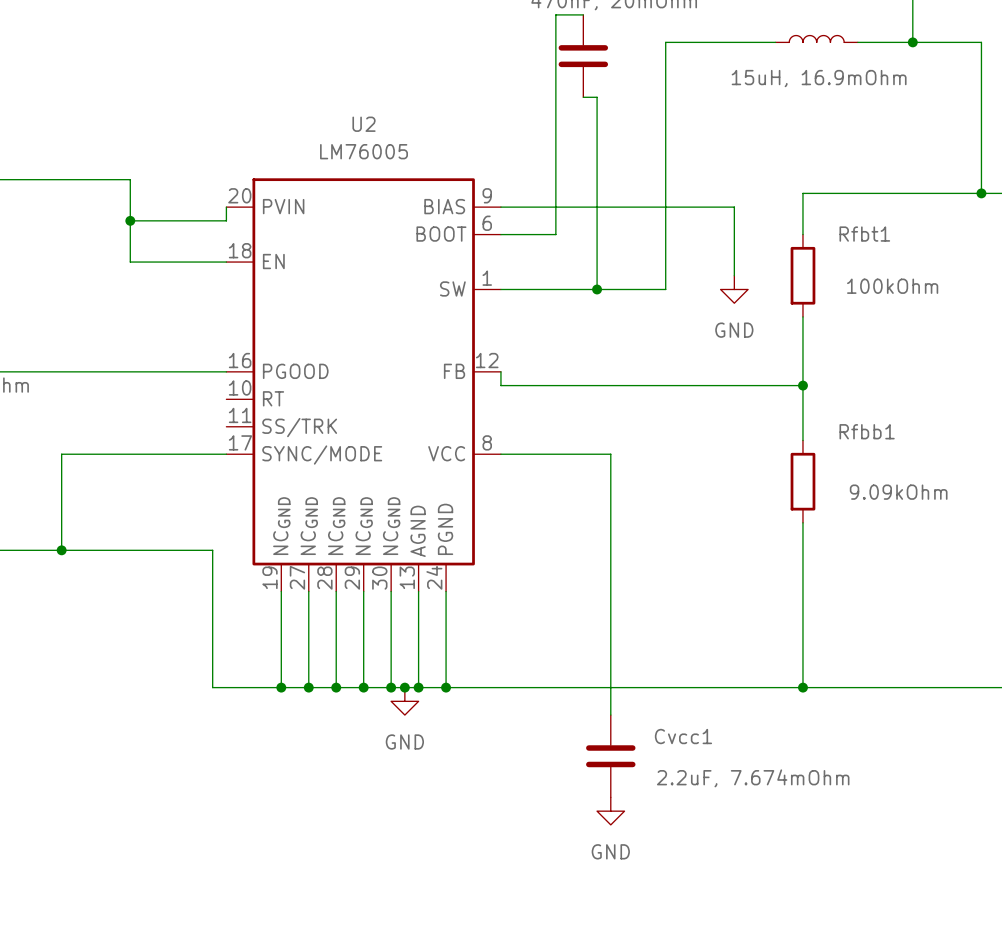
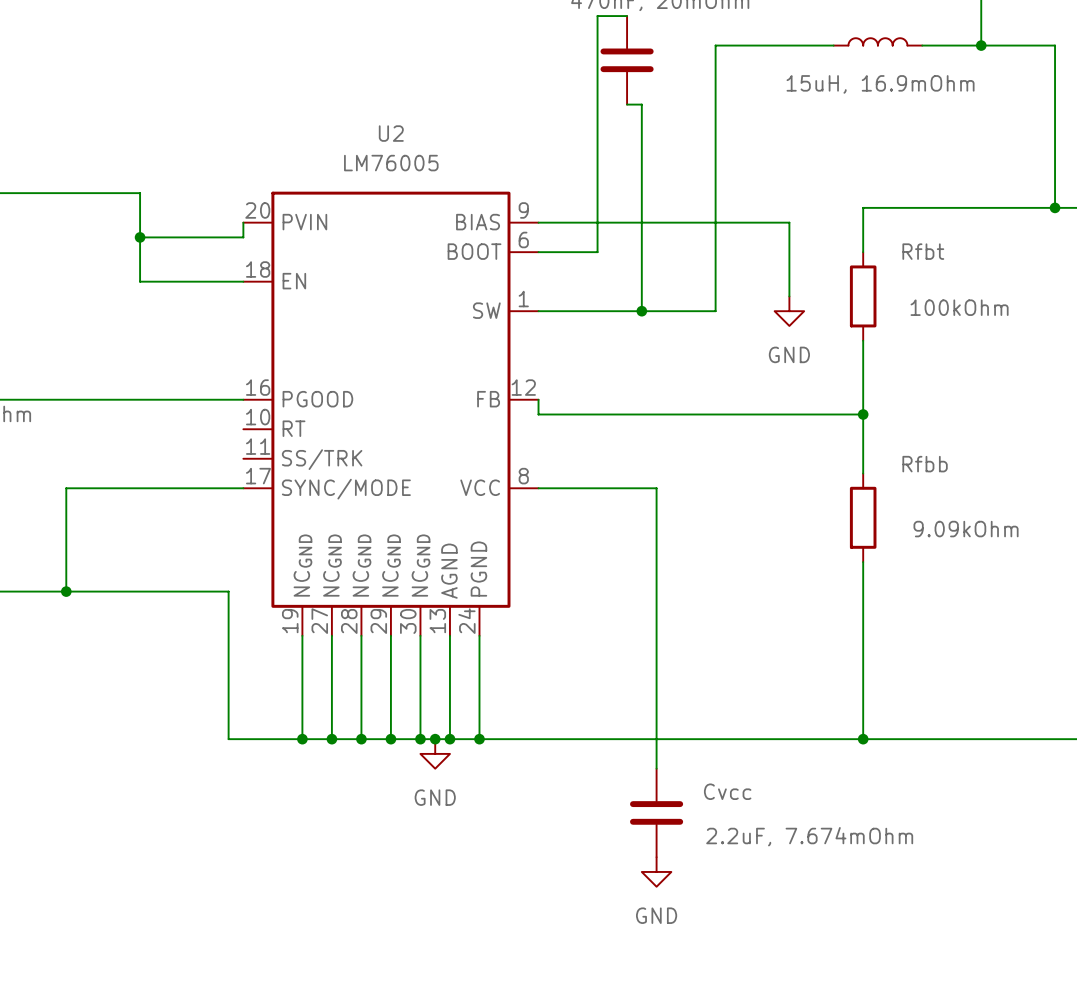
Rfbt1 name: Rfbt1 (864, 234) -> Rfbt (923, 251)
Rfbb1 name: Rfbb1 (867, 431) -> Rfbb (925, 464)
Cvcc1 name: Cvcc1 (683, 736) -> Cvcc (727, 791)

